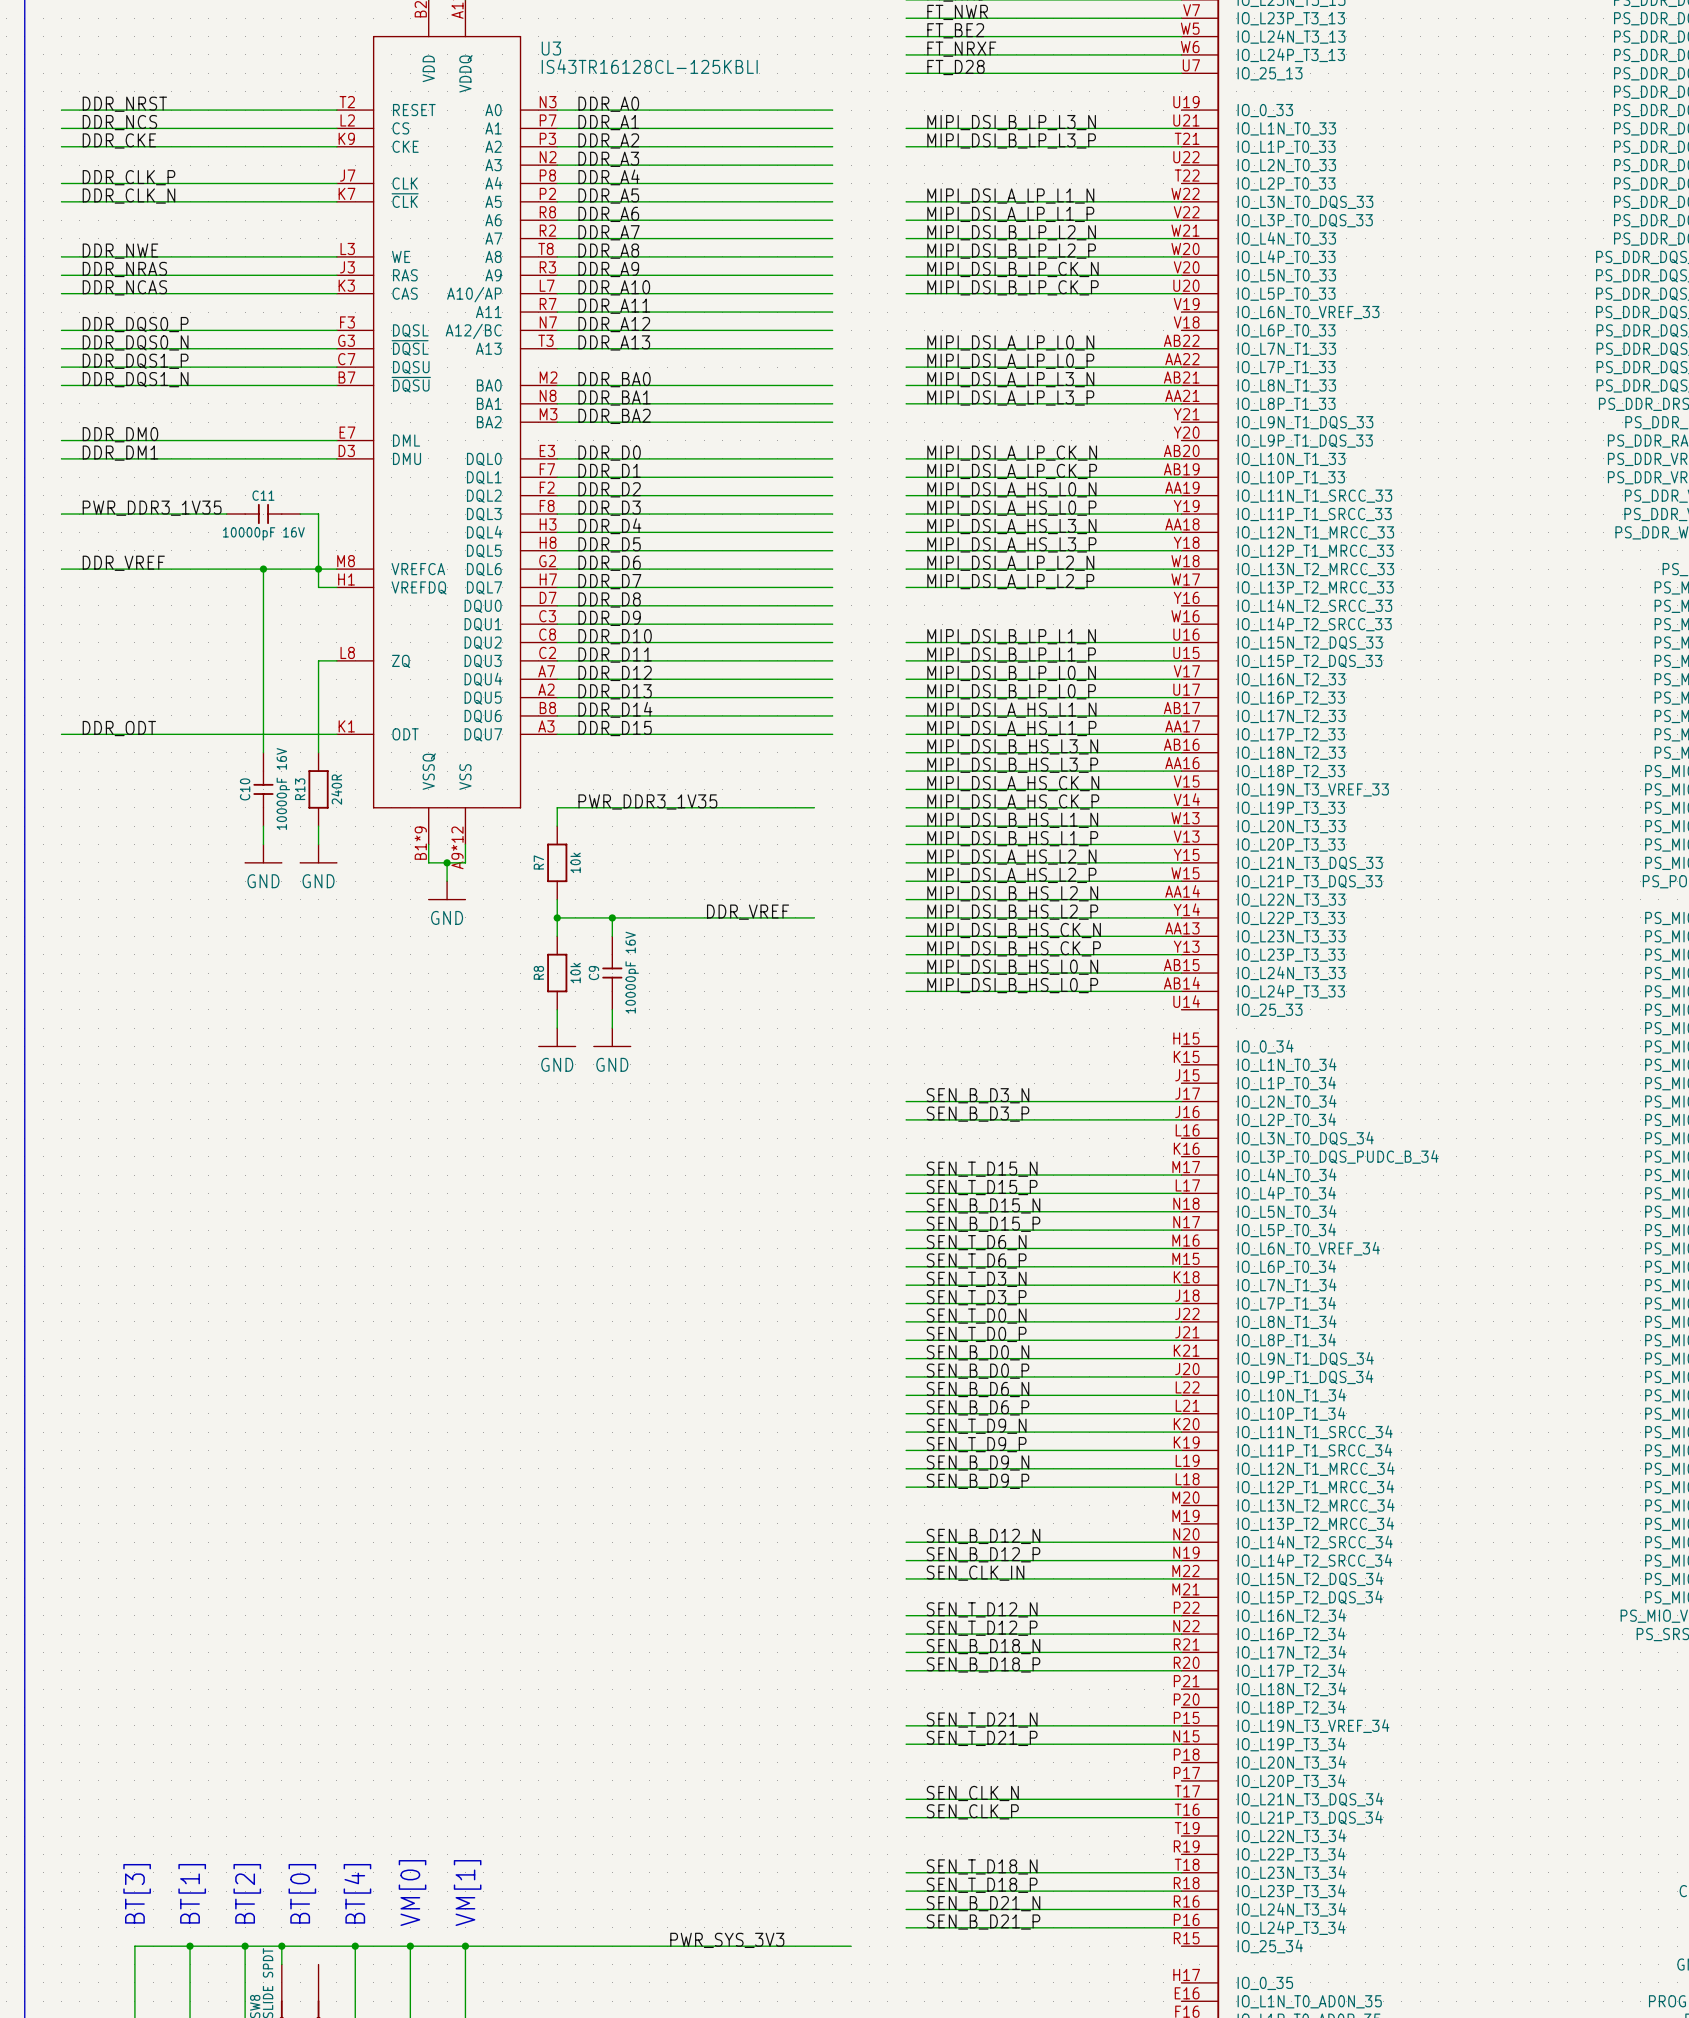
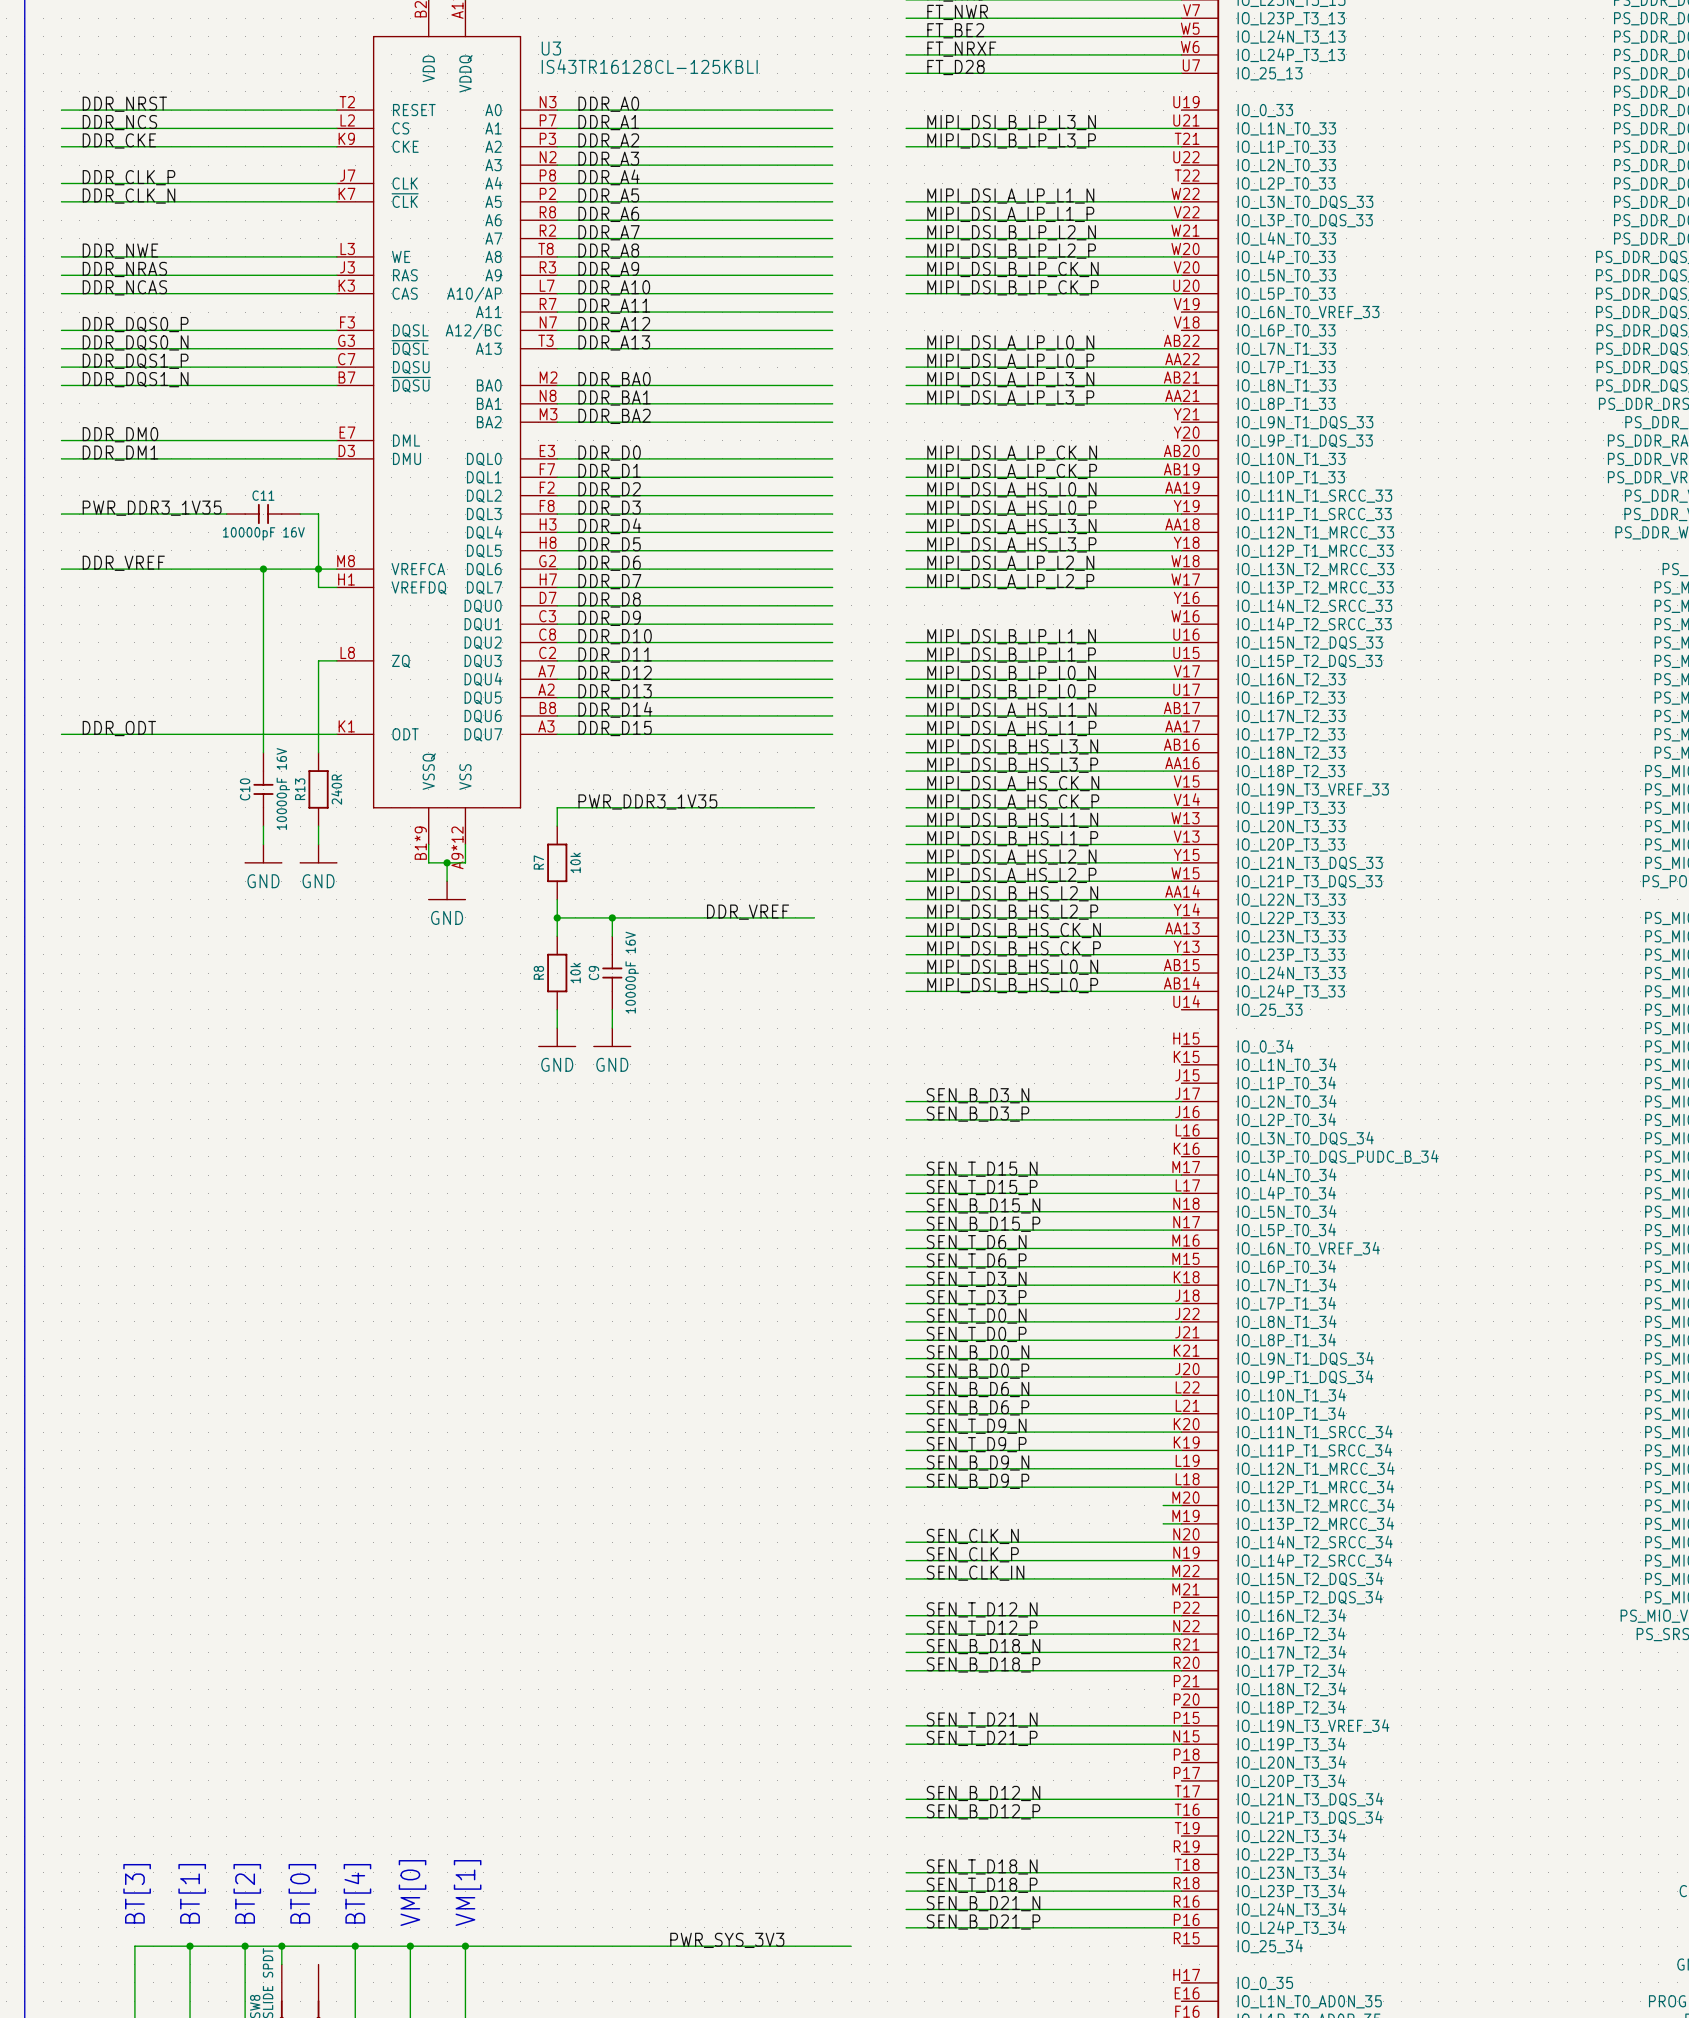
wire: none -> (1163, 1505) (1181, 1505)
wire: none -> (1163, 1523) (1181, 1523)
label: SEN_B_D12_N (983, 1536) -> SEN_CLK_N (972, 1536)
label: SEN_B_D12_P (983, 1554) -> SEN_CLK_P (972, 1554)
label: SEN_CLK_N (972, 1793) -> SEN_B_D12_N (983, 1793)
label: SEN_CLK_P (972, 1811) -> SEN_B_D12_P (983, 1811)

